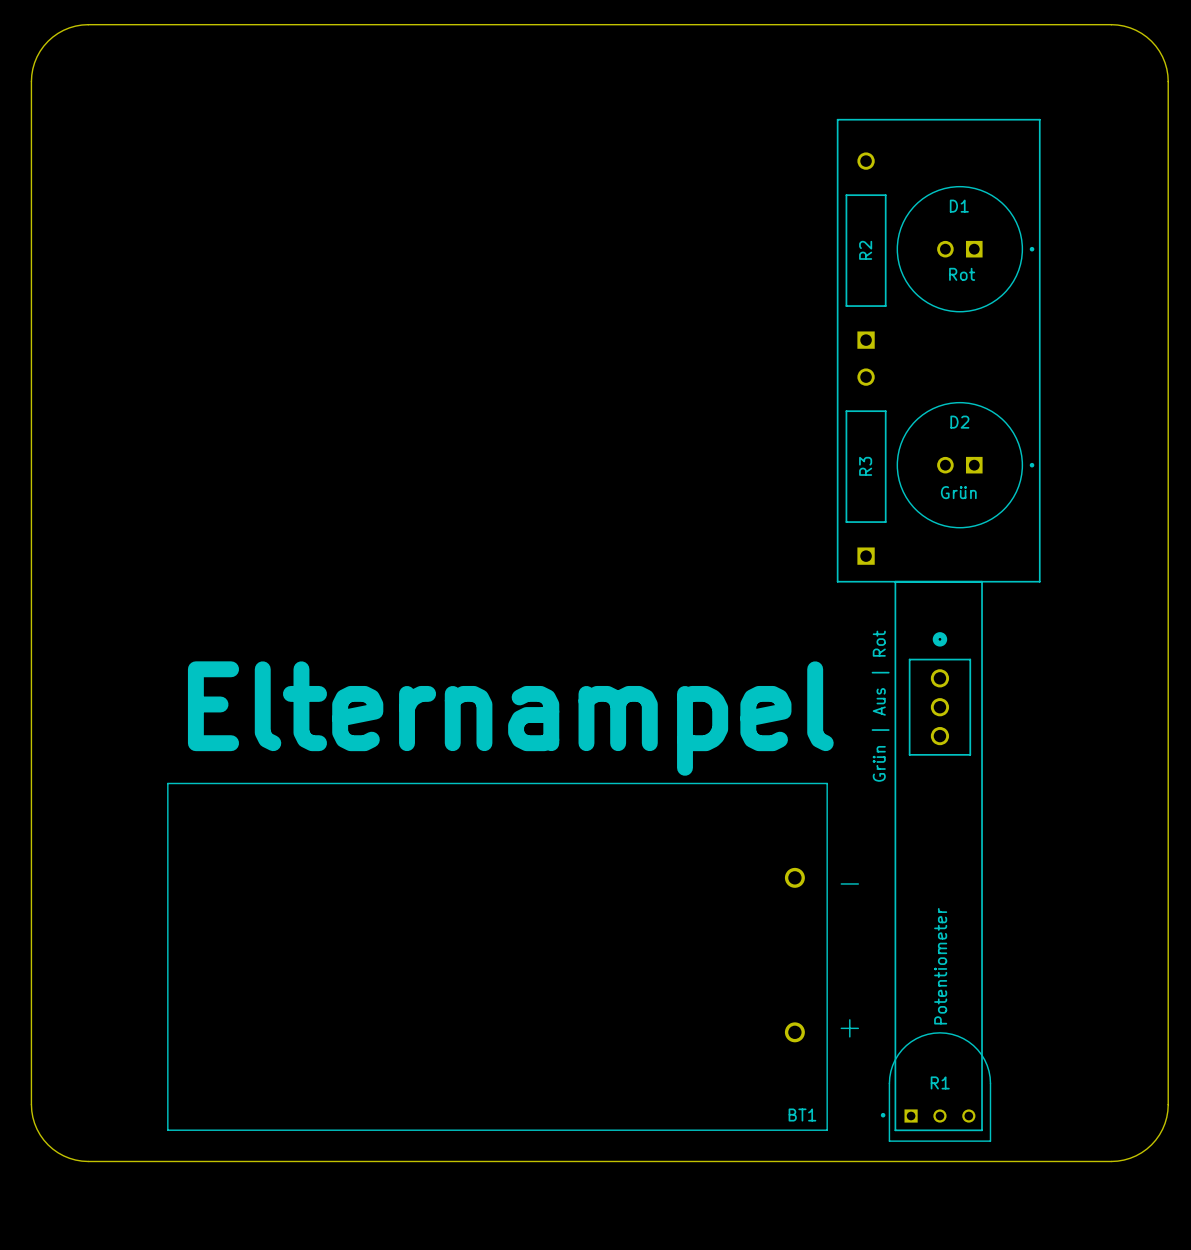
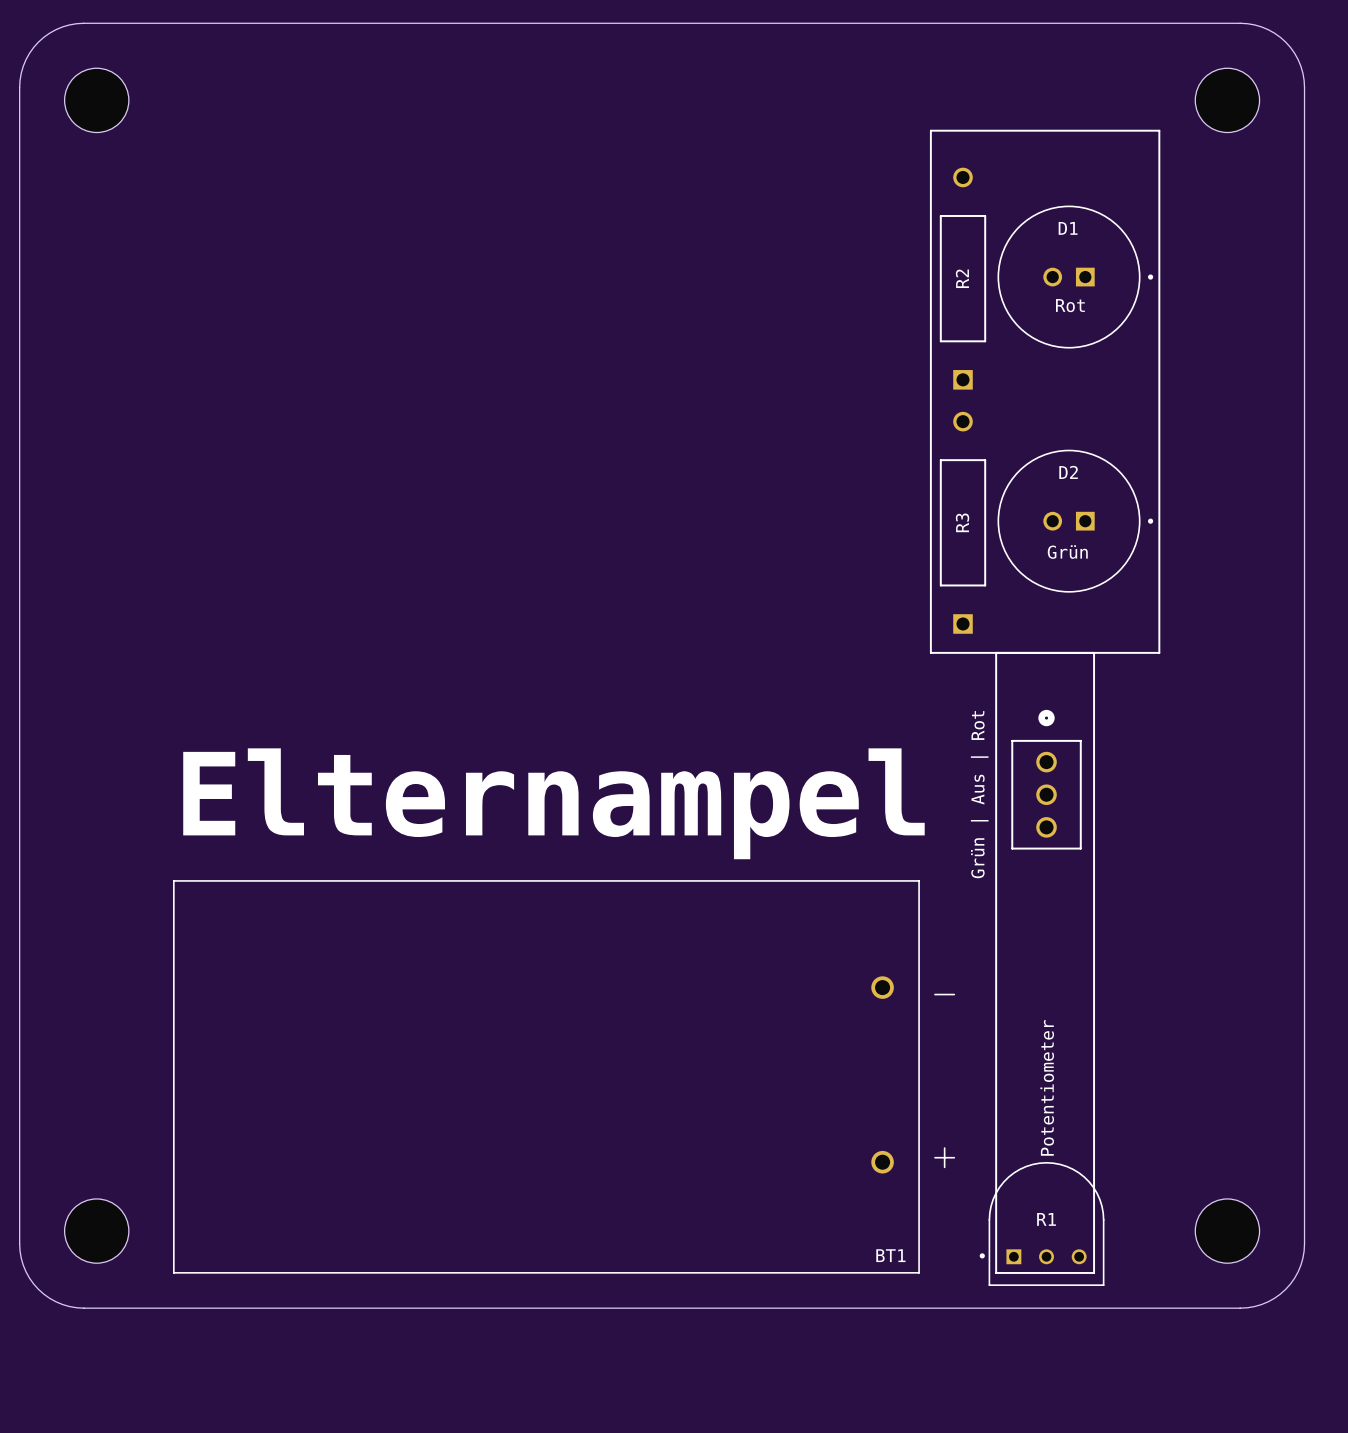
part: none -> (96, 100)
part: none -> (1227, 100)
part: none -> (96, 1231)
part: none -> (1227, 1231)

